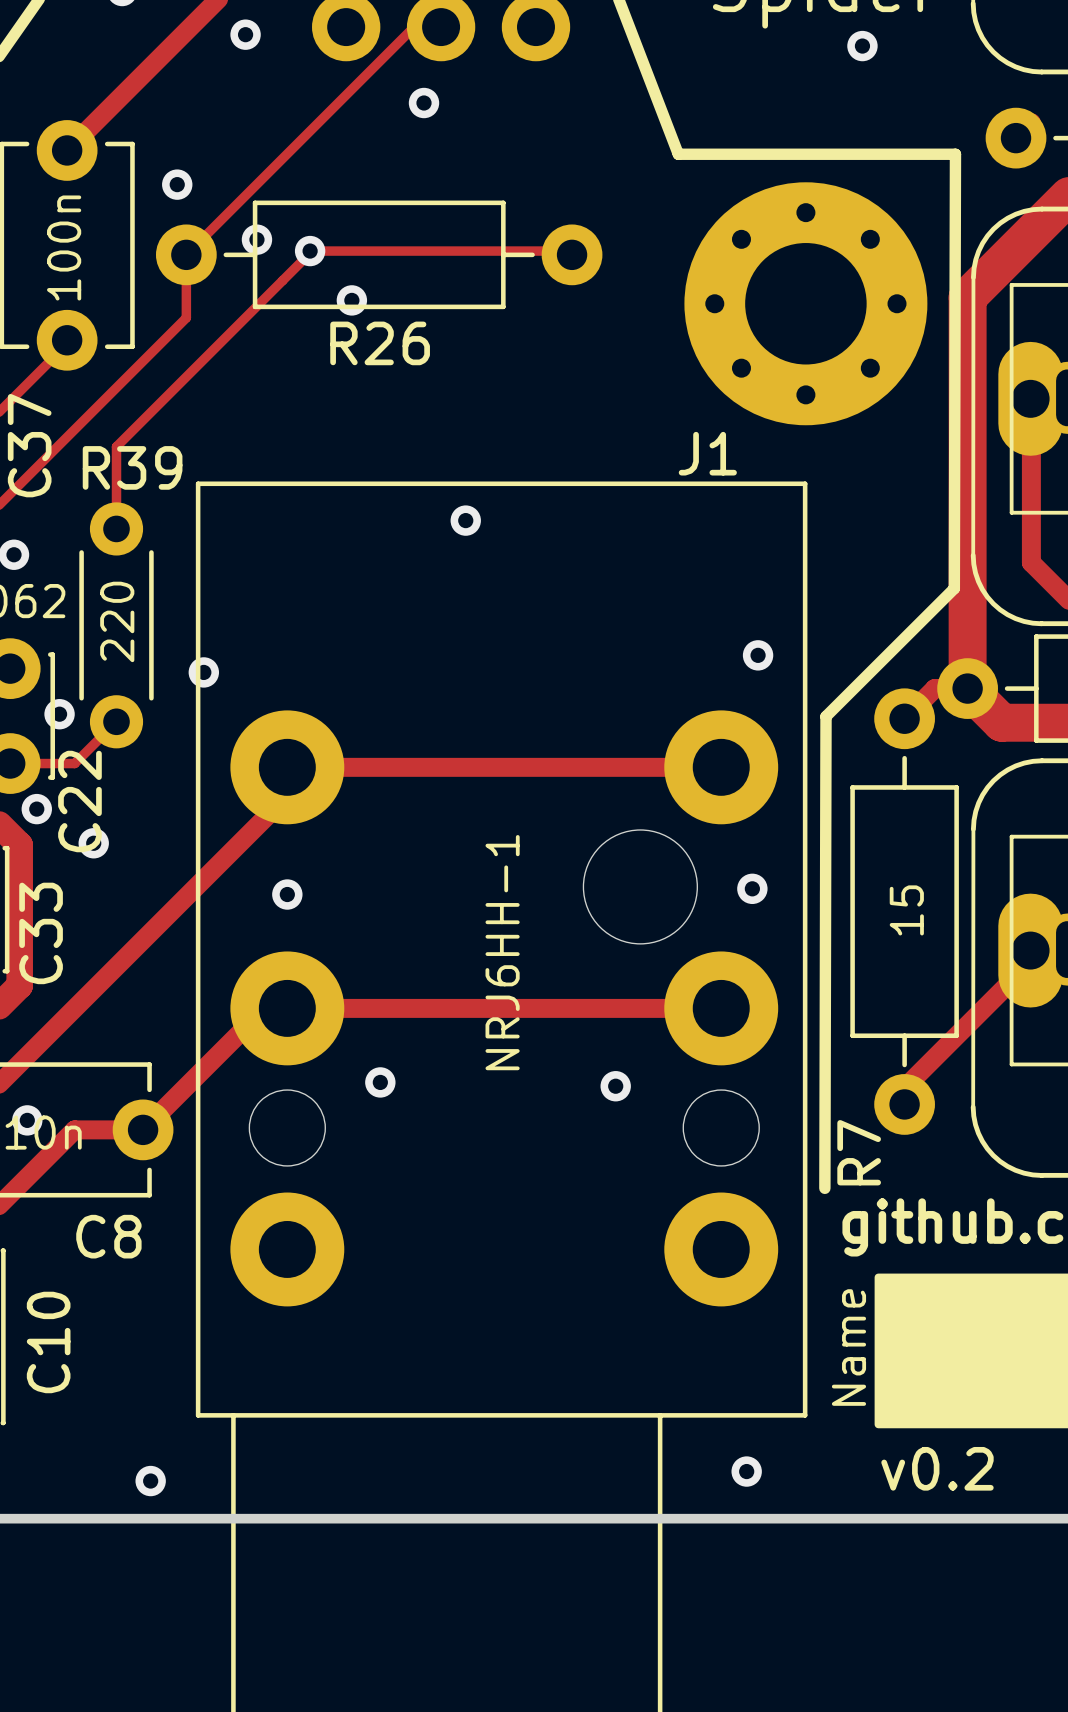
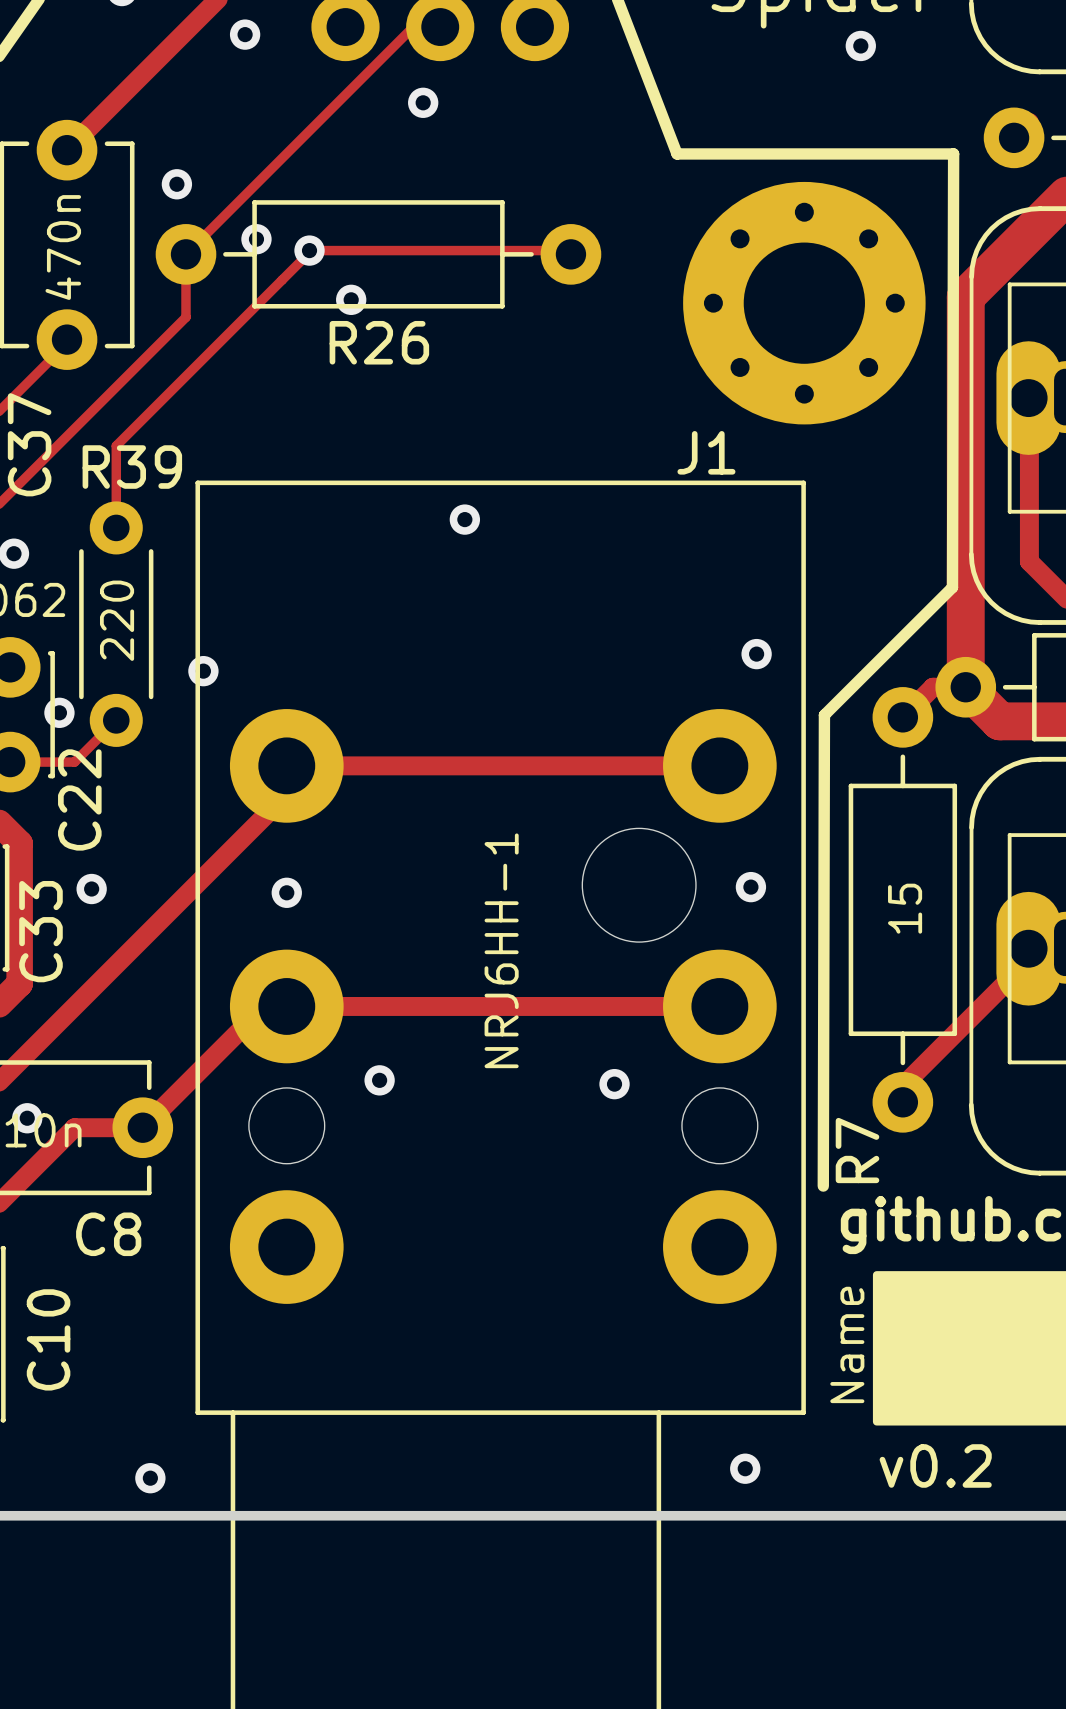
part value: 100n (64, 247) -> 470n (63, 247)
via: (36, 809) -> none
via position: (93, 843) -> (91, 889)

